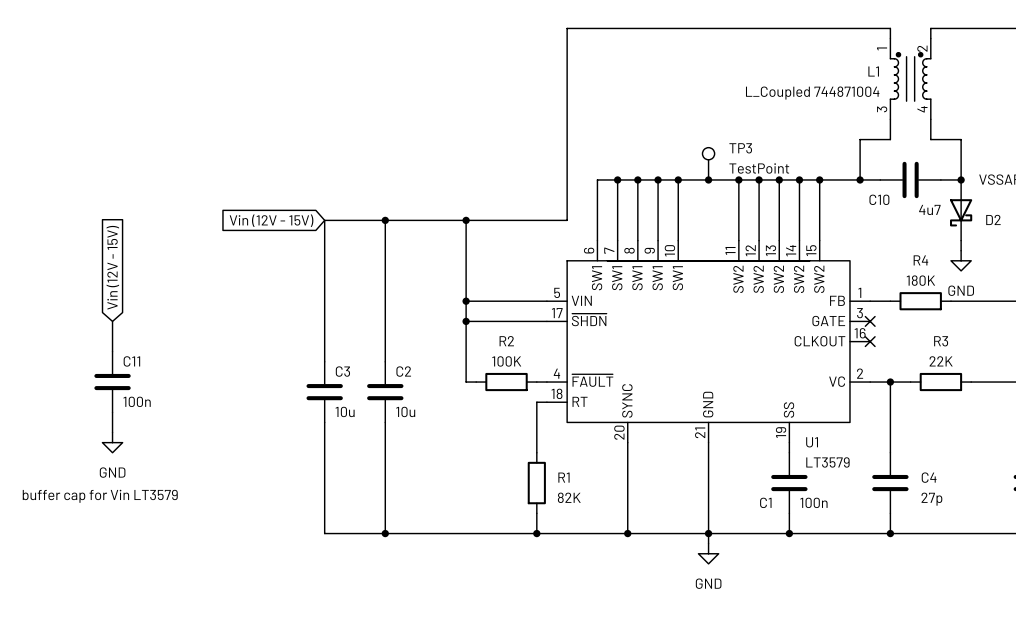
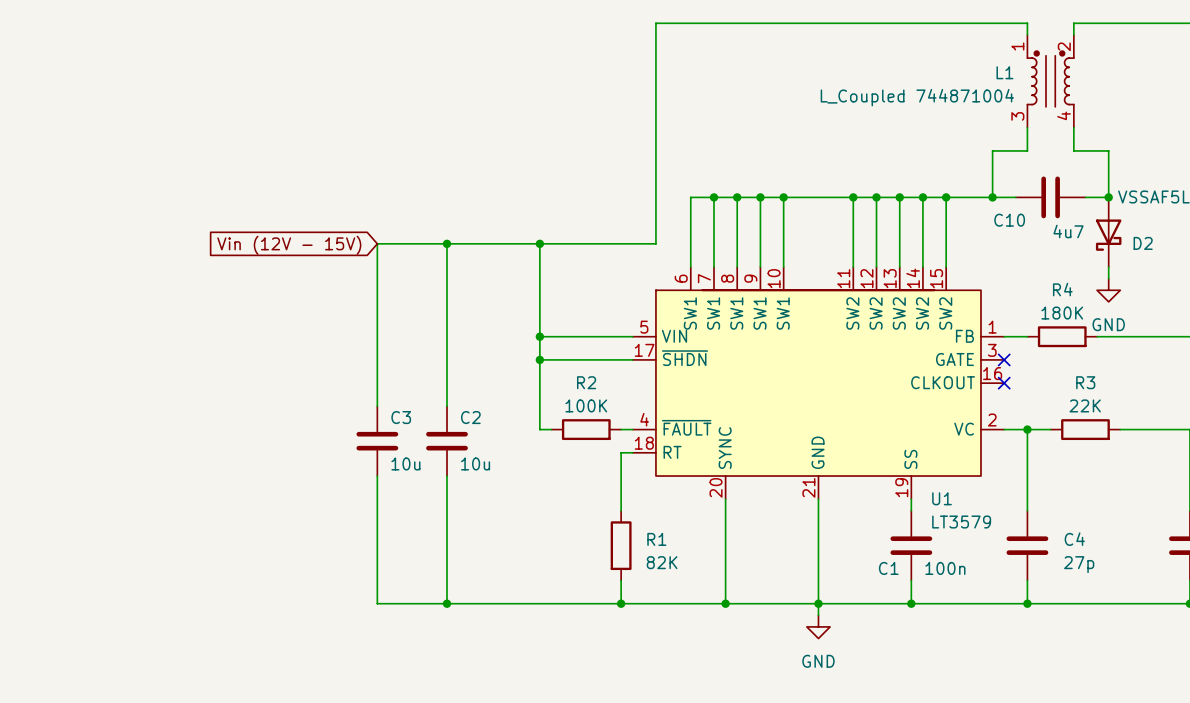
TP3: TestPoint (708, 163) -> none
junction: (708, 179) -> none
global label: Vin (12V - 15V) (112, 267) -> none
wire: (112, 321) (112, 351) -> none
C11: 100n (112, 382) -> none
wire: (112, 412) (112, 432) -> none
power symbol: GND (112, 442) -> none
text: buffer cap for Vin LT3579 (100, 496) -> none

